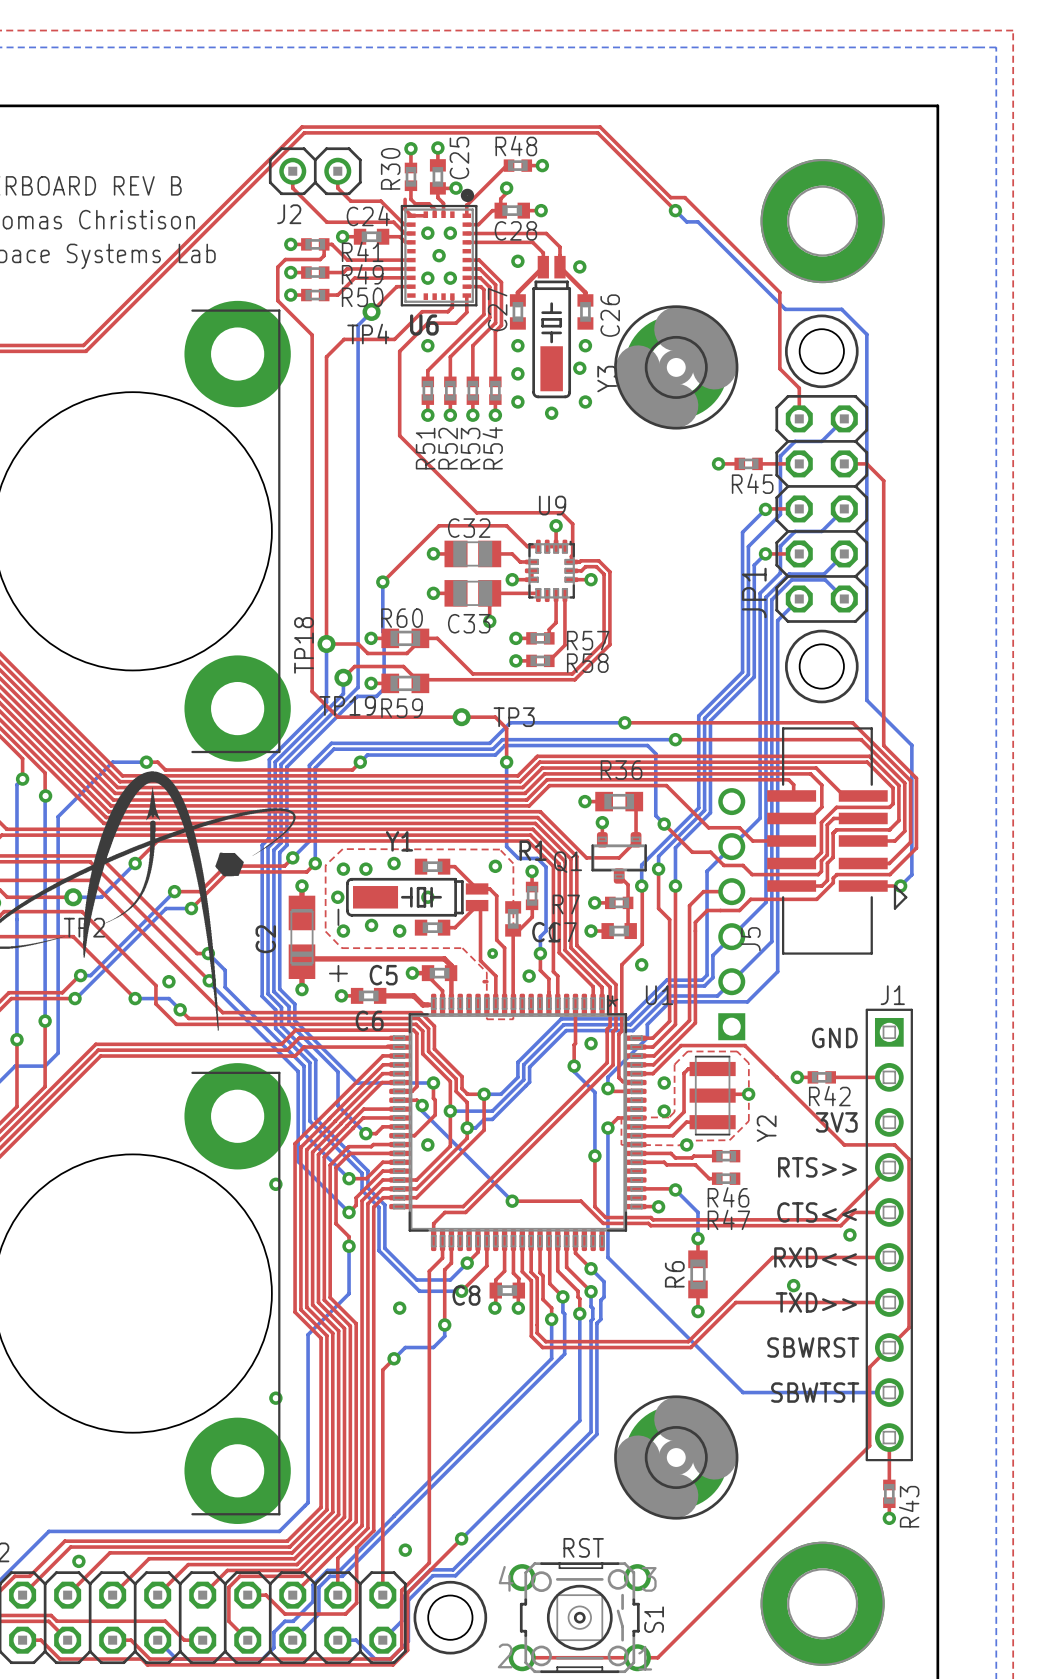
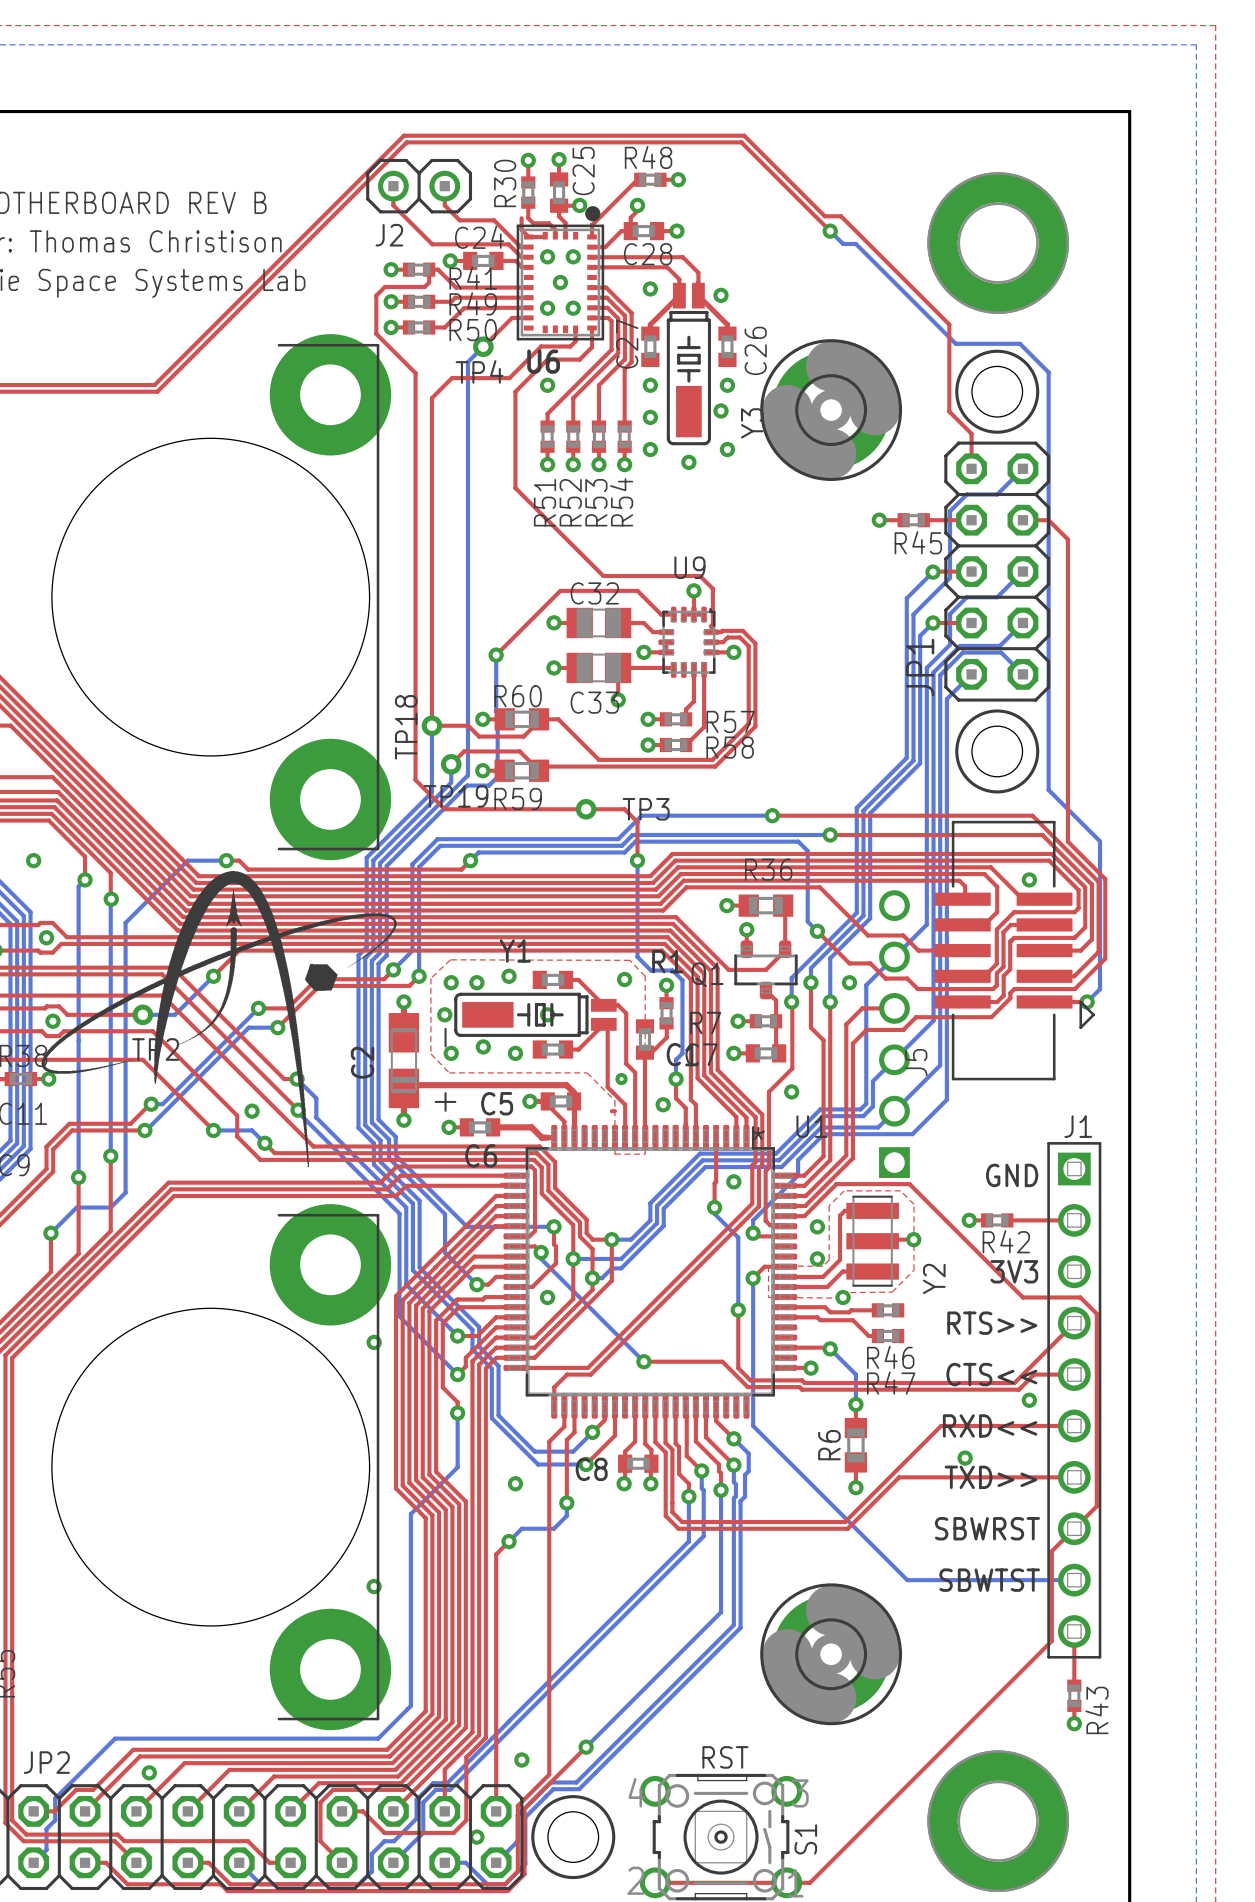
via: none -> (1029, 879)
via: none -> (849, 982)
via: none -> (476, 1837)

